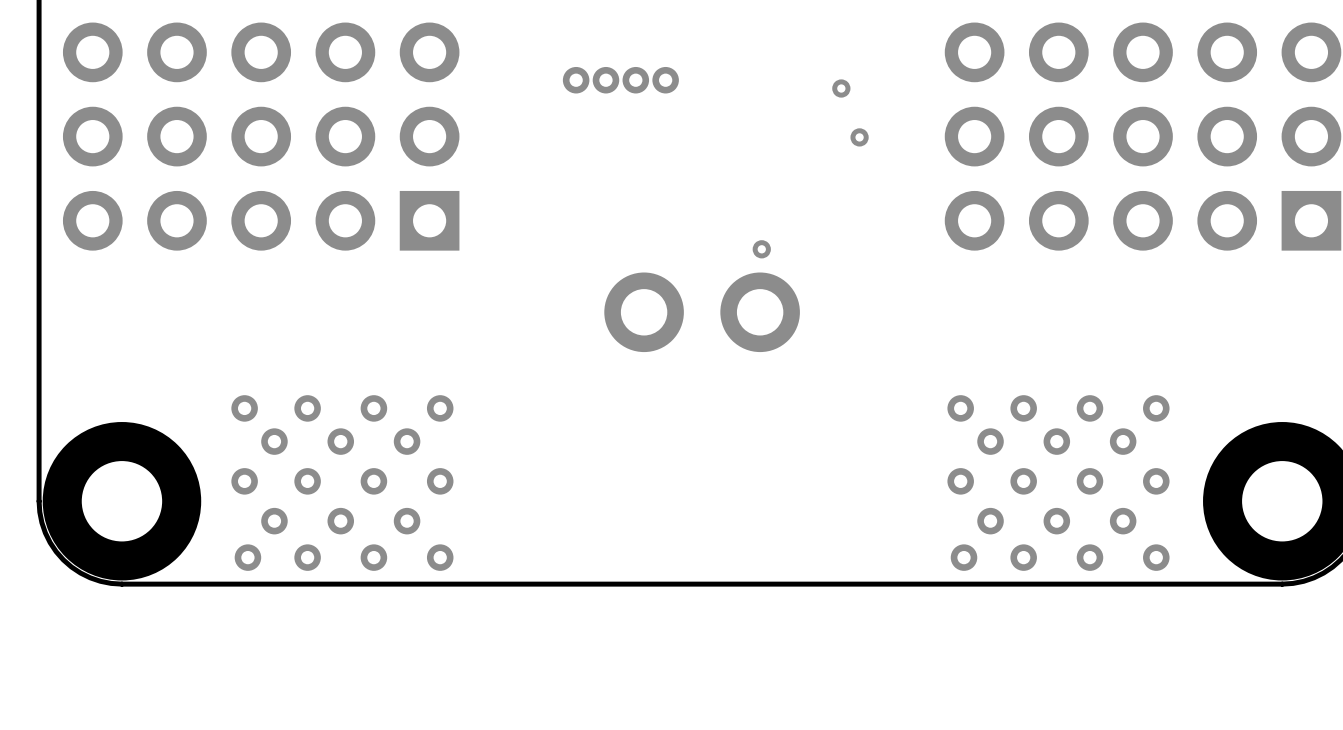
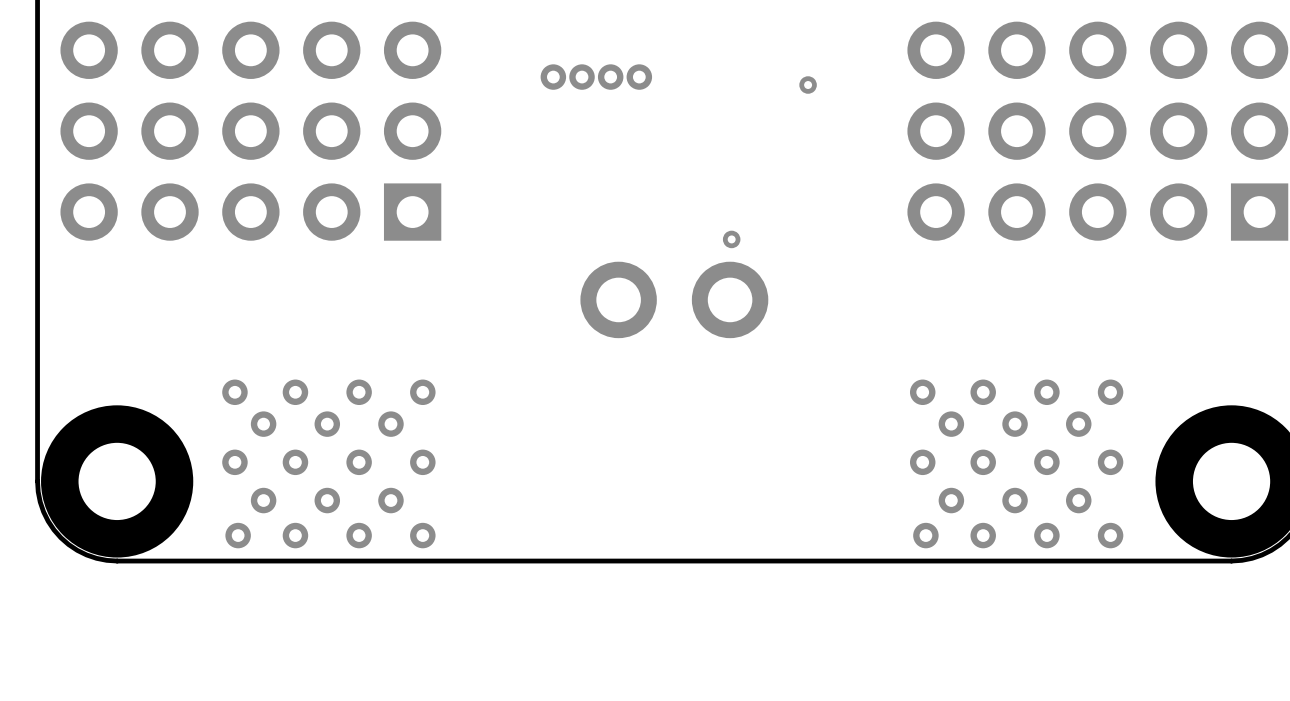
via: (859, 137) -> none

